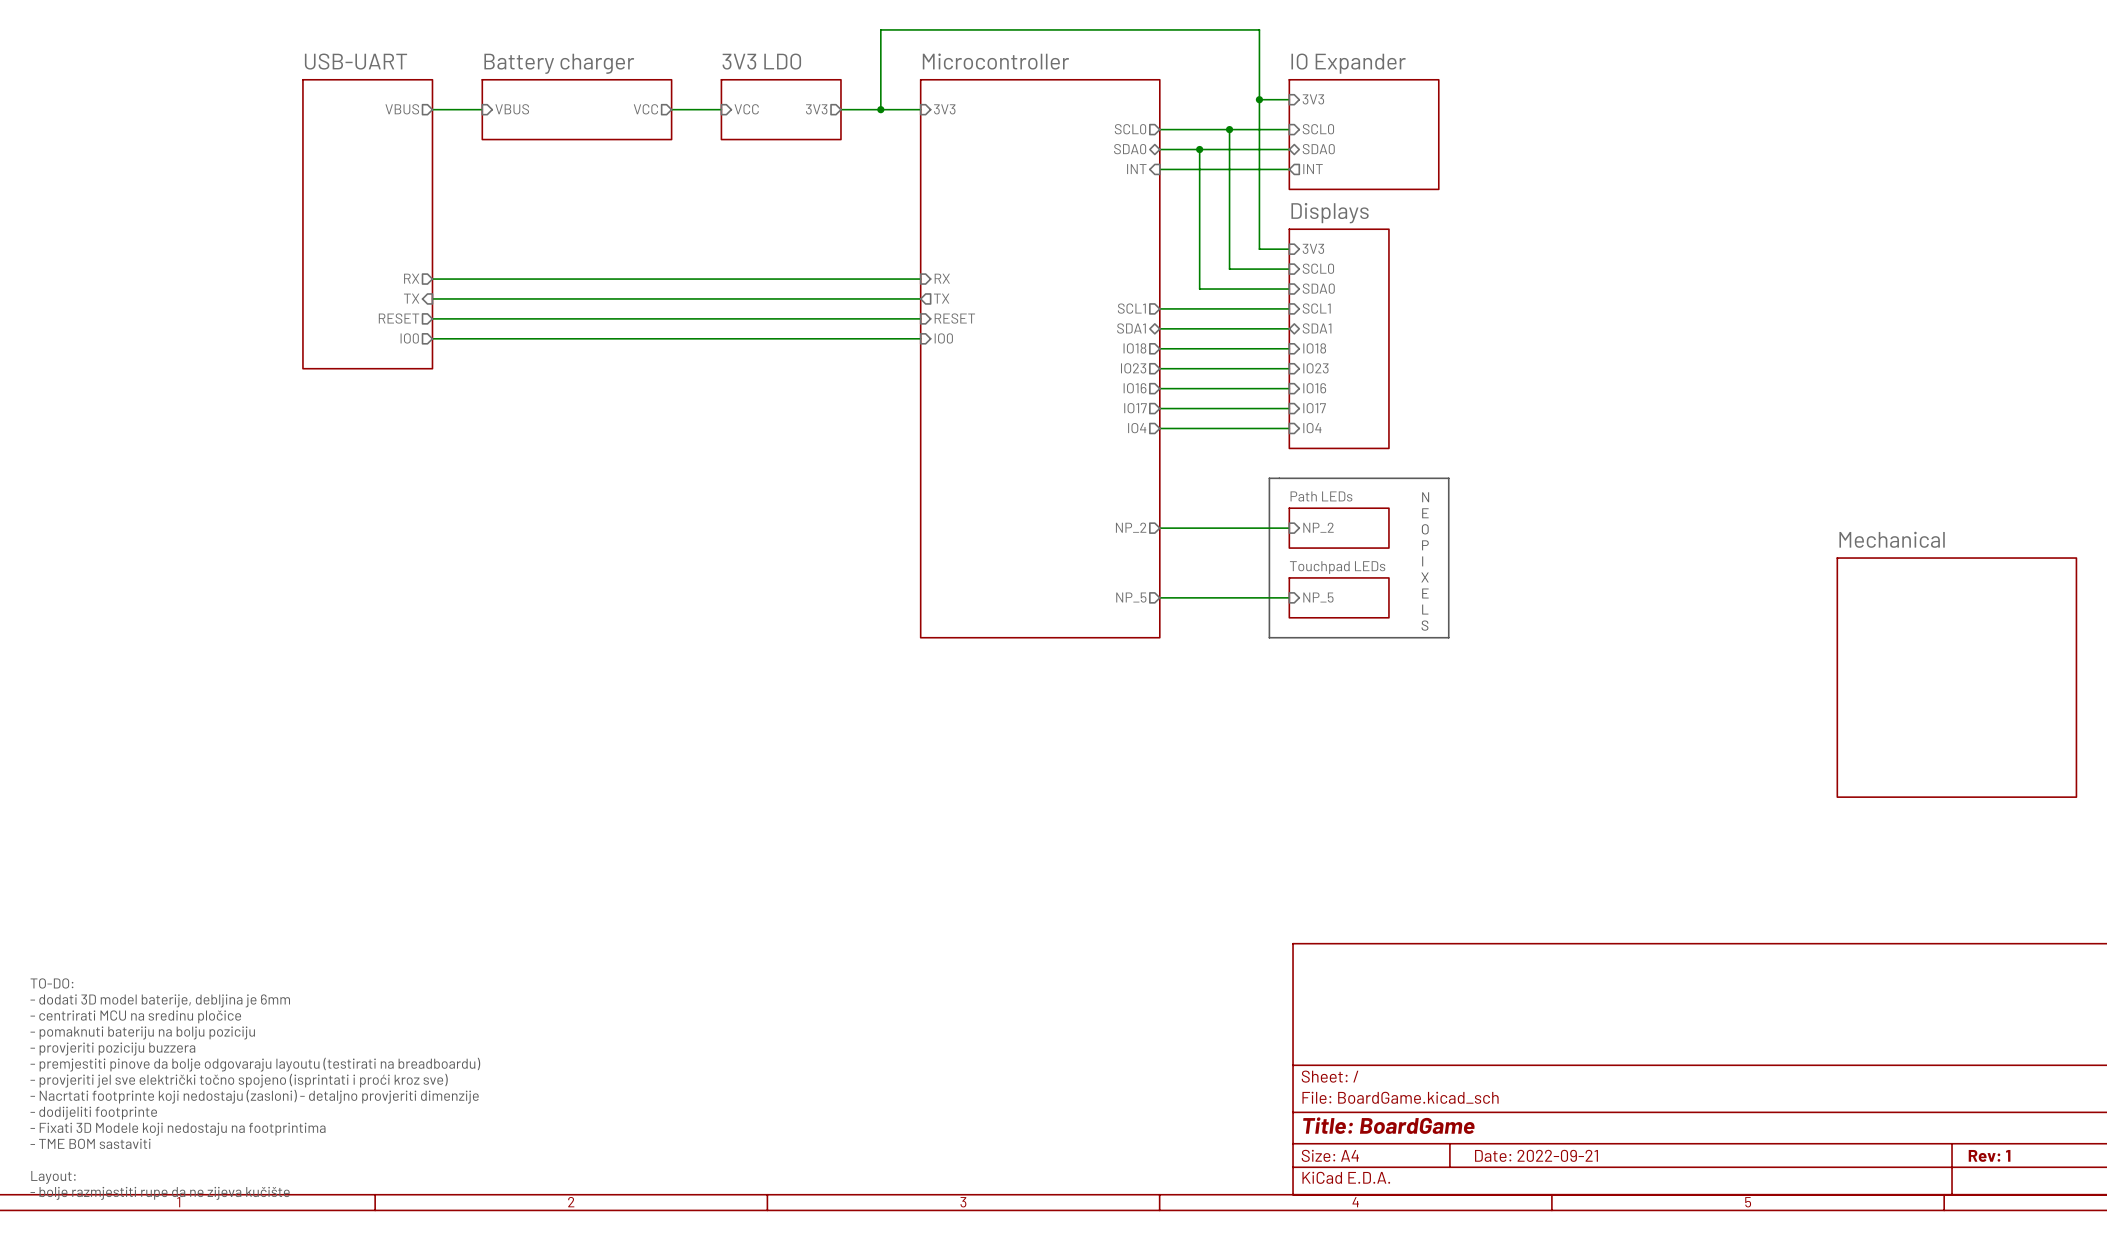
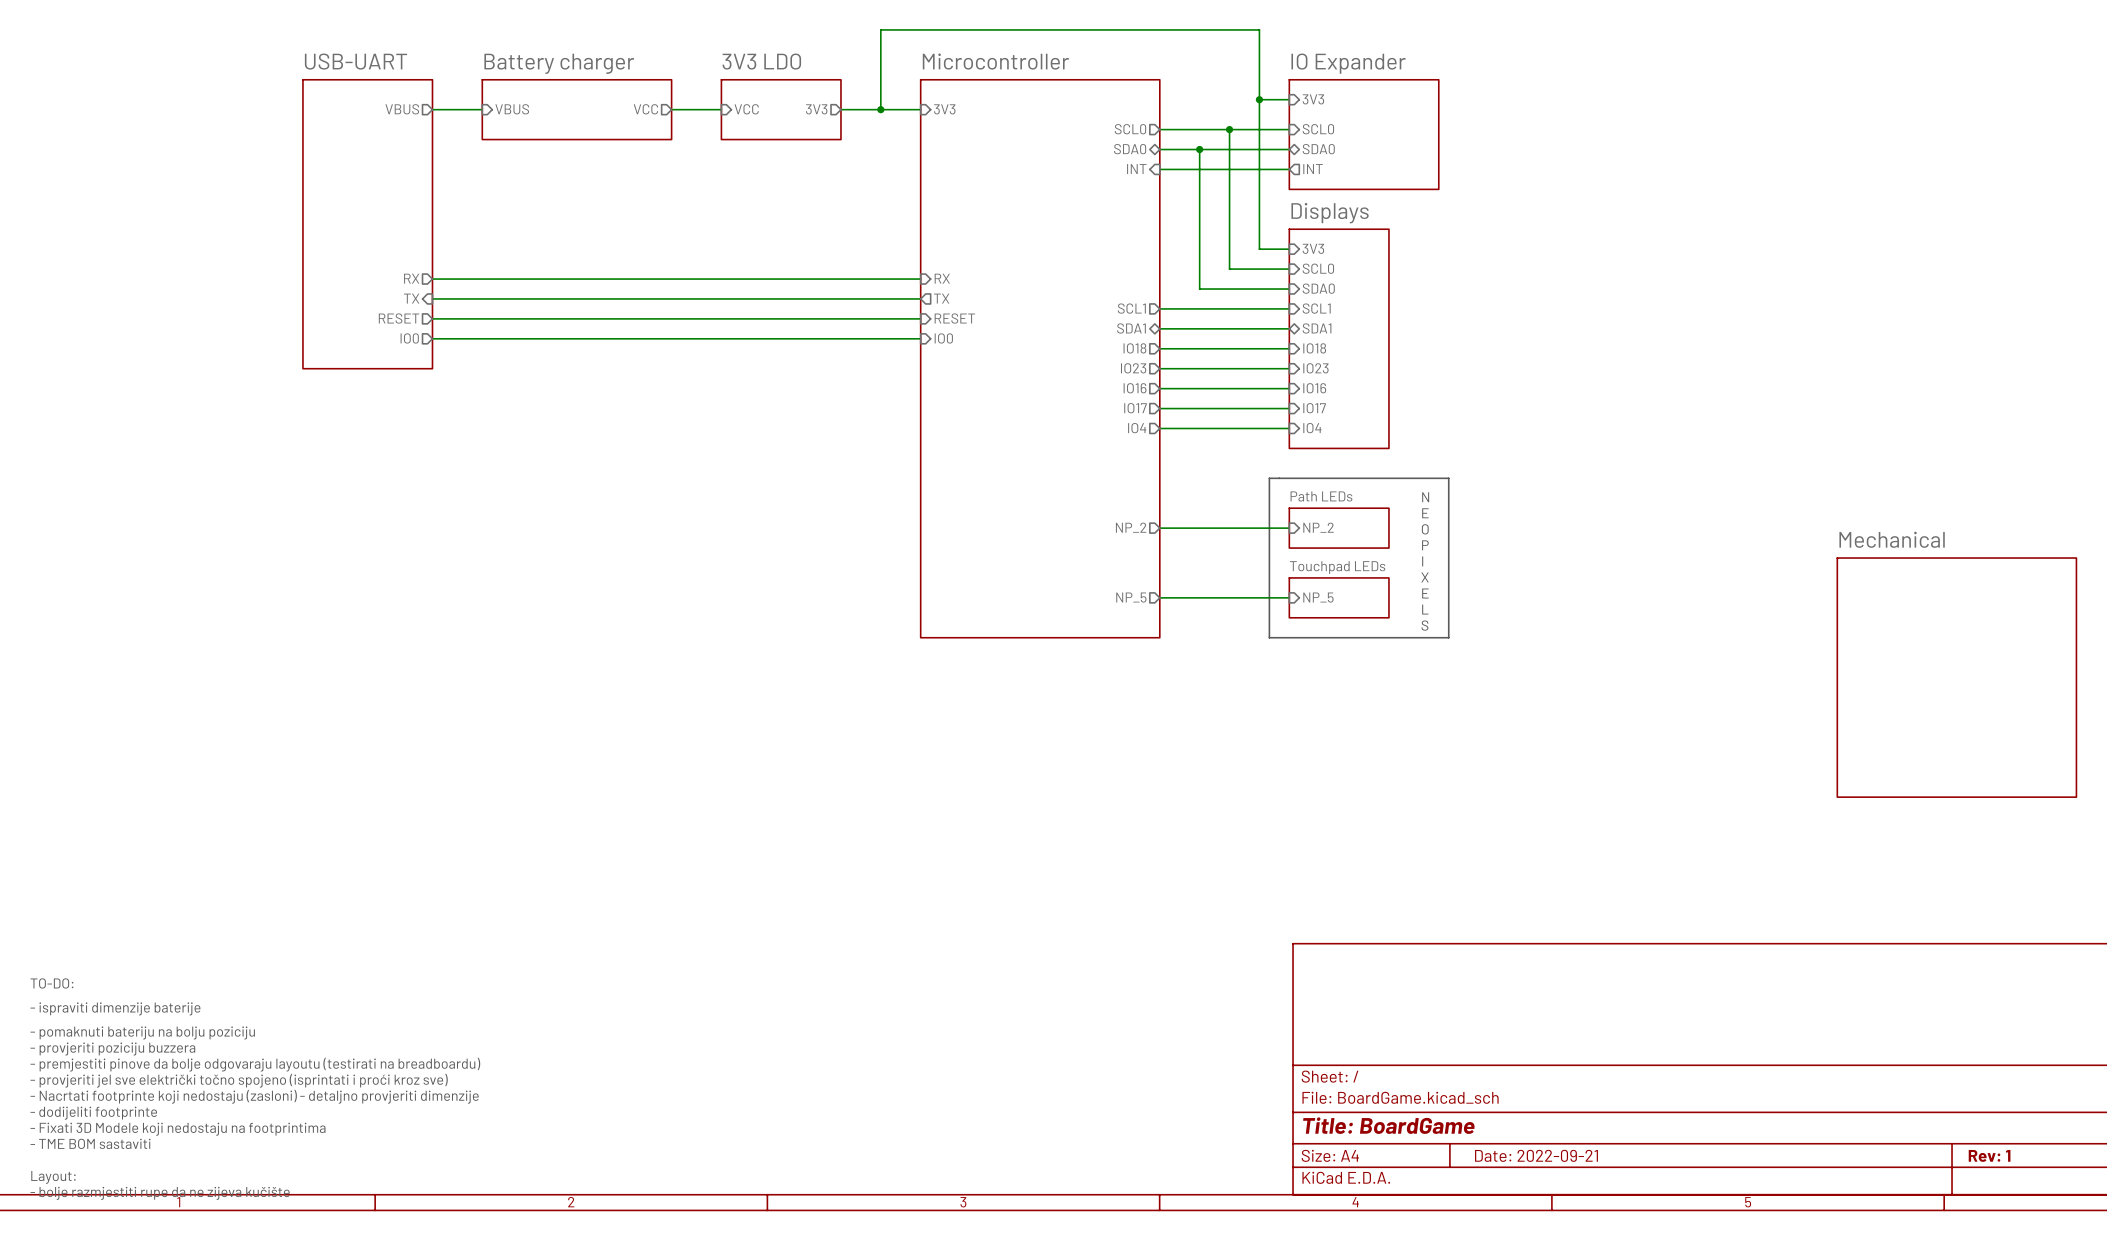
text: - dodati 3D model baterije, debljina je 6mm (160, 1000) -> none
text: none -> - ispraviti dimenzije baterije (115, 1008)
text: - centrirati MCU na sredinu pločice (135, 1016) -> none

